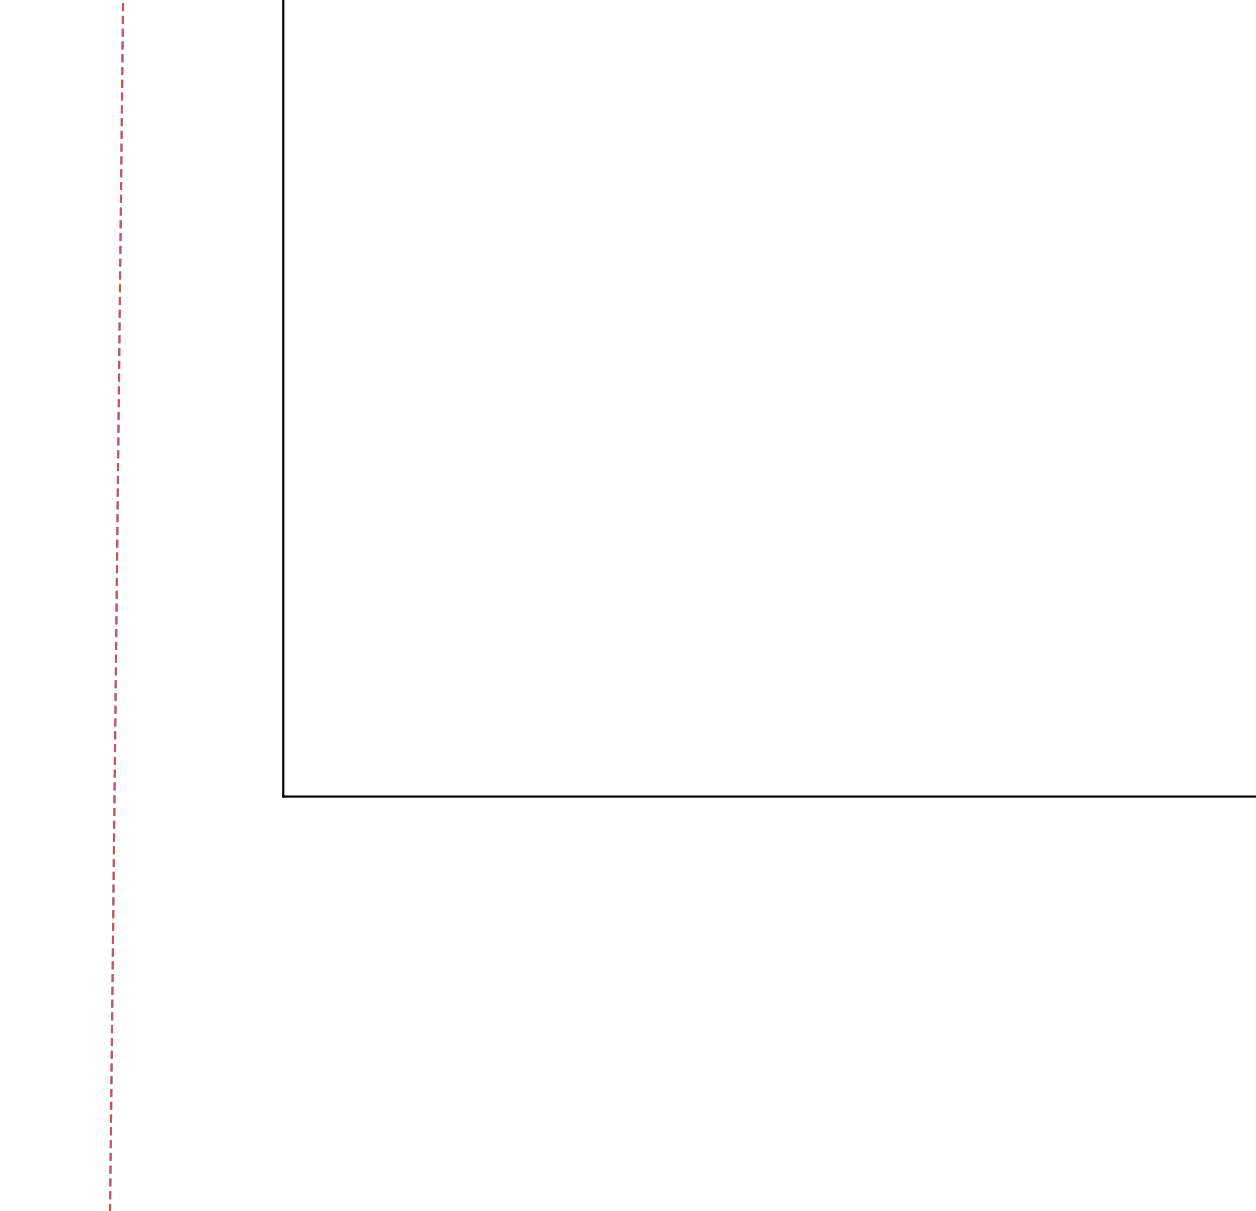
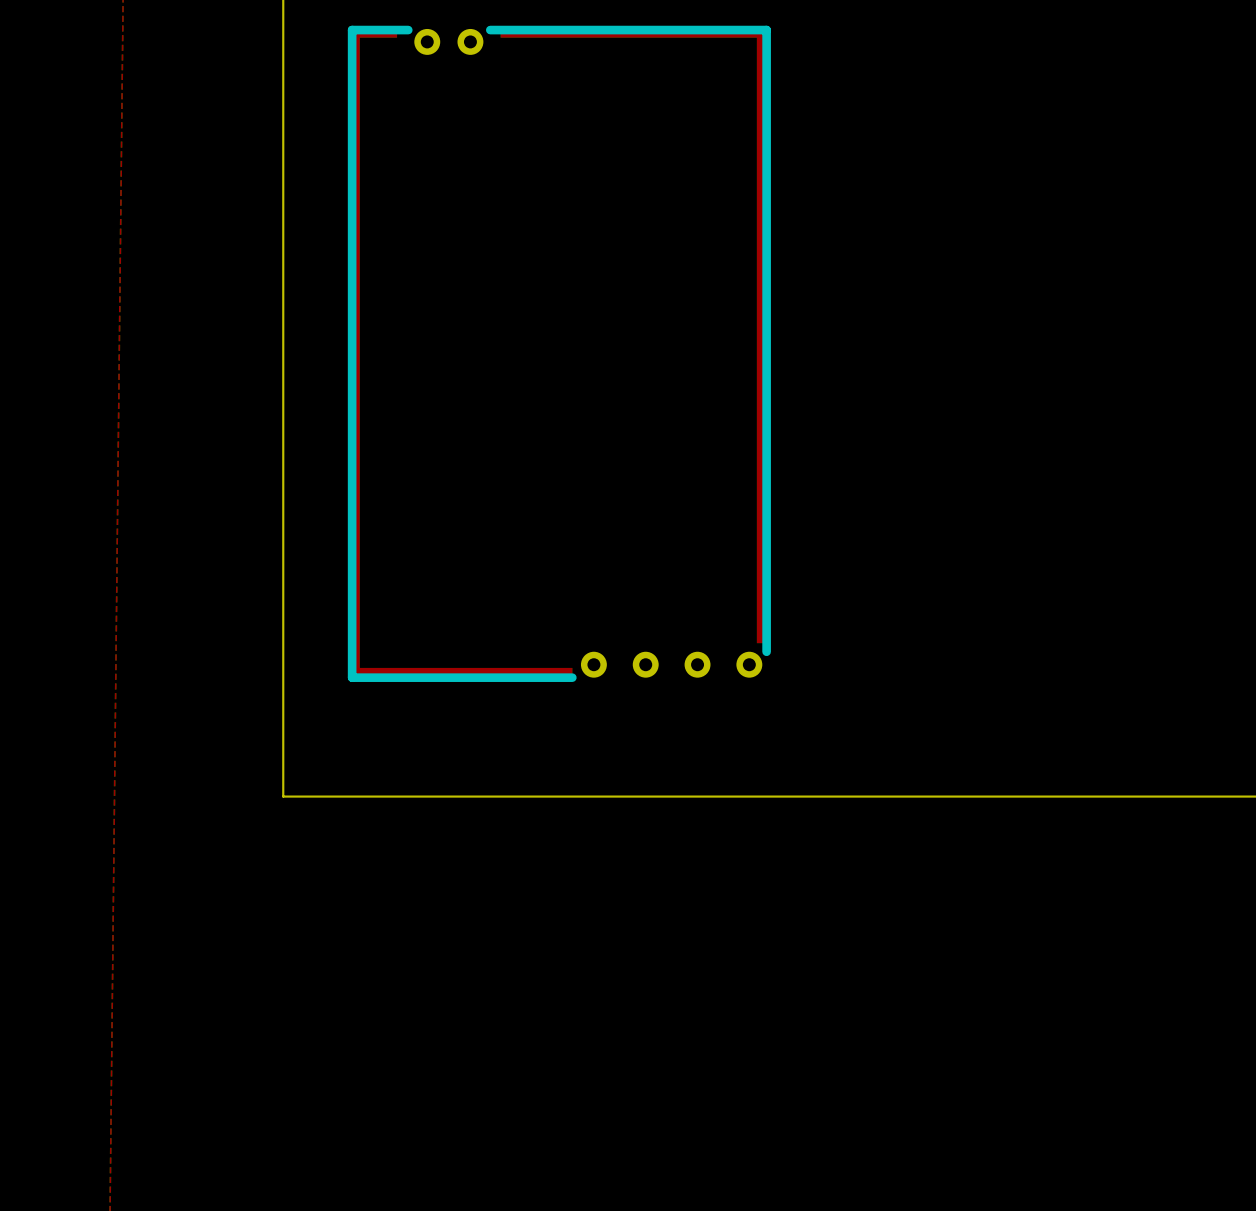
part: none -> (559, 353)

